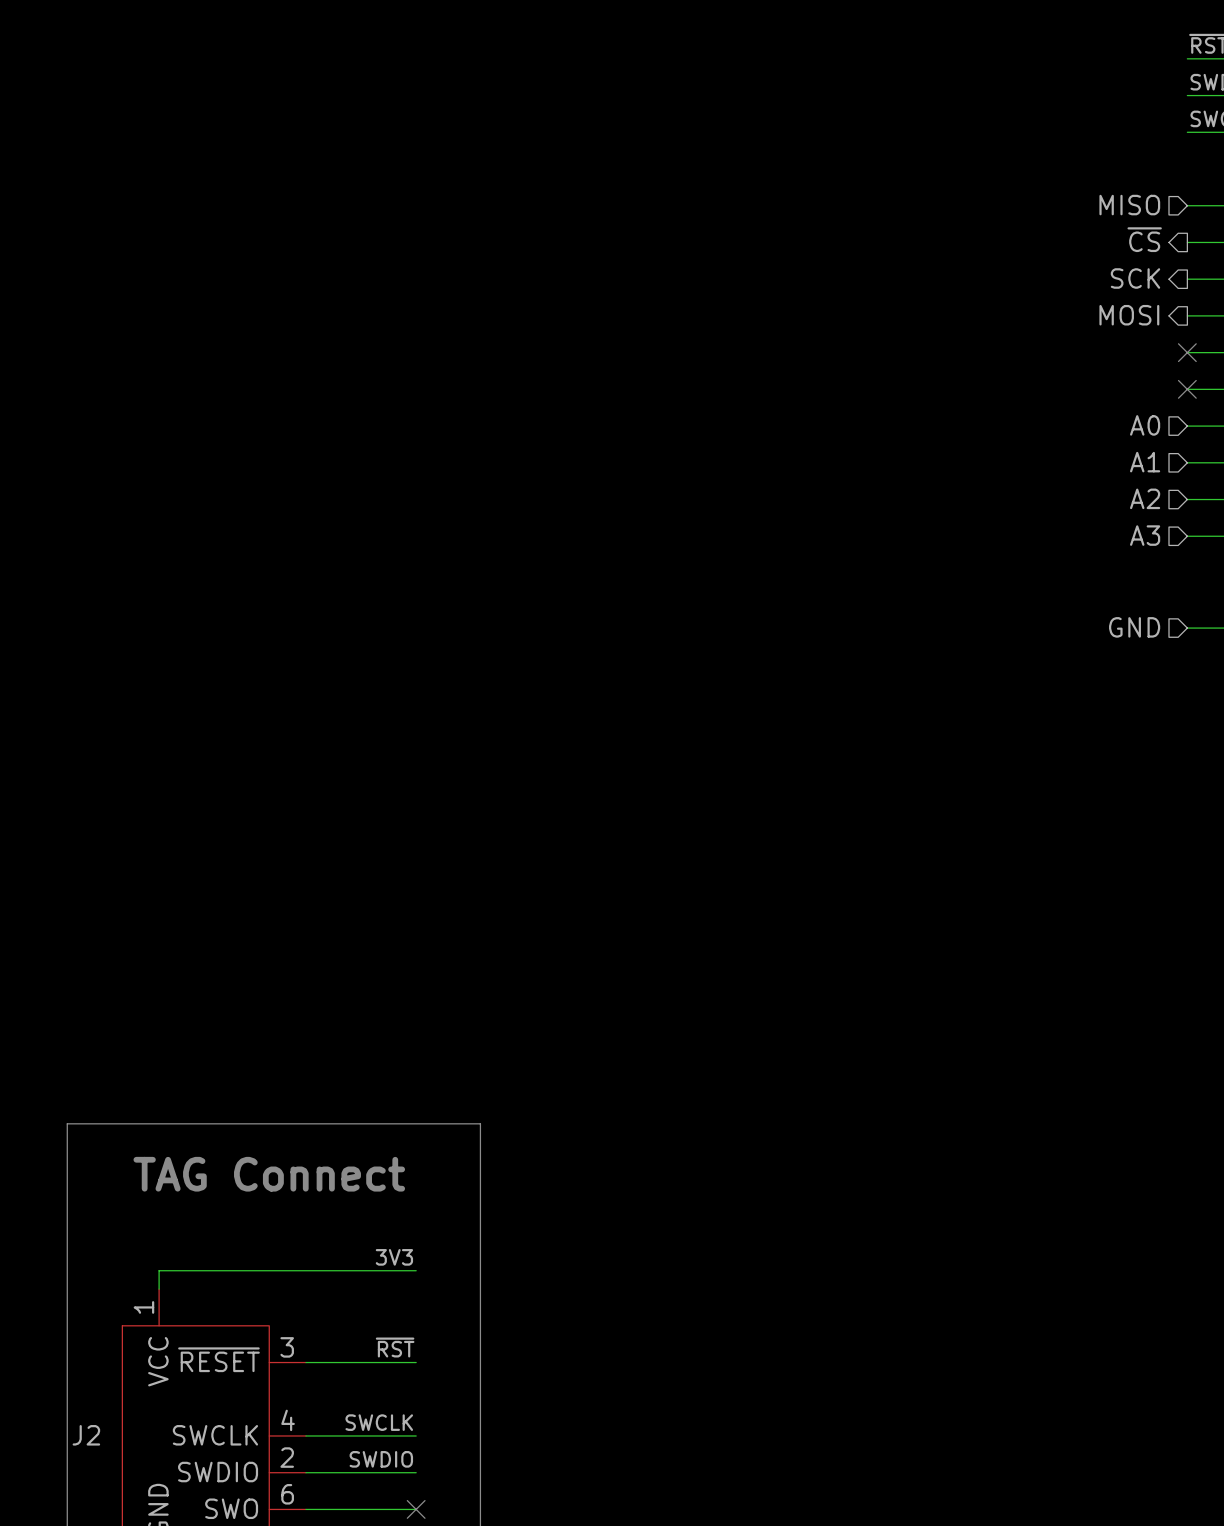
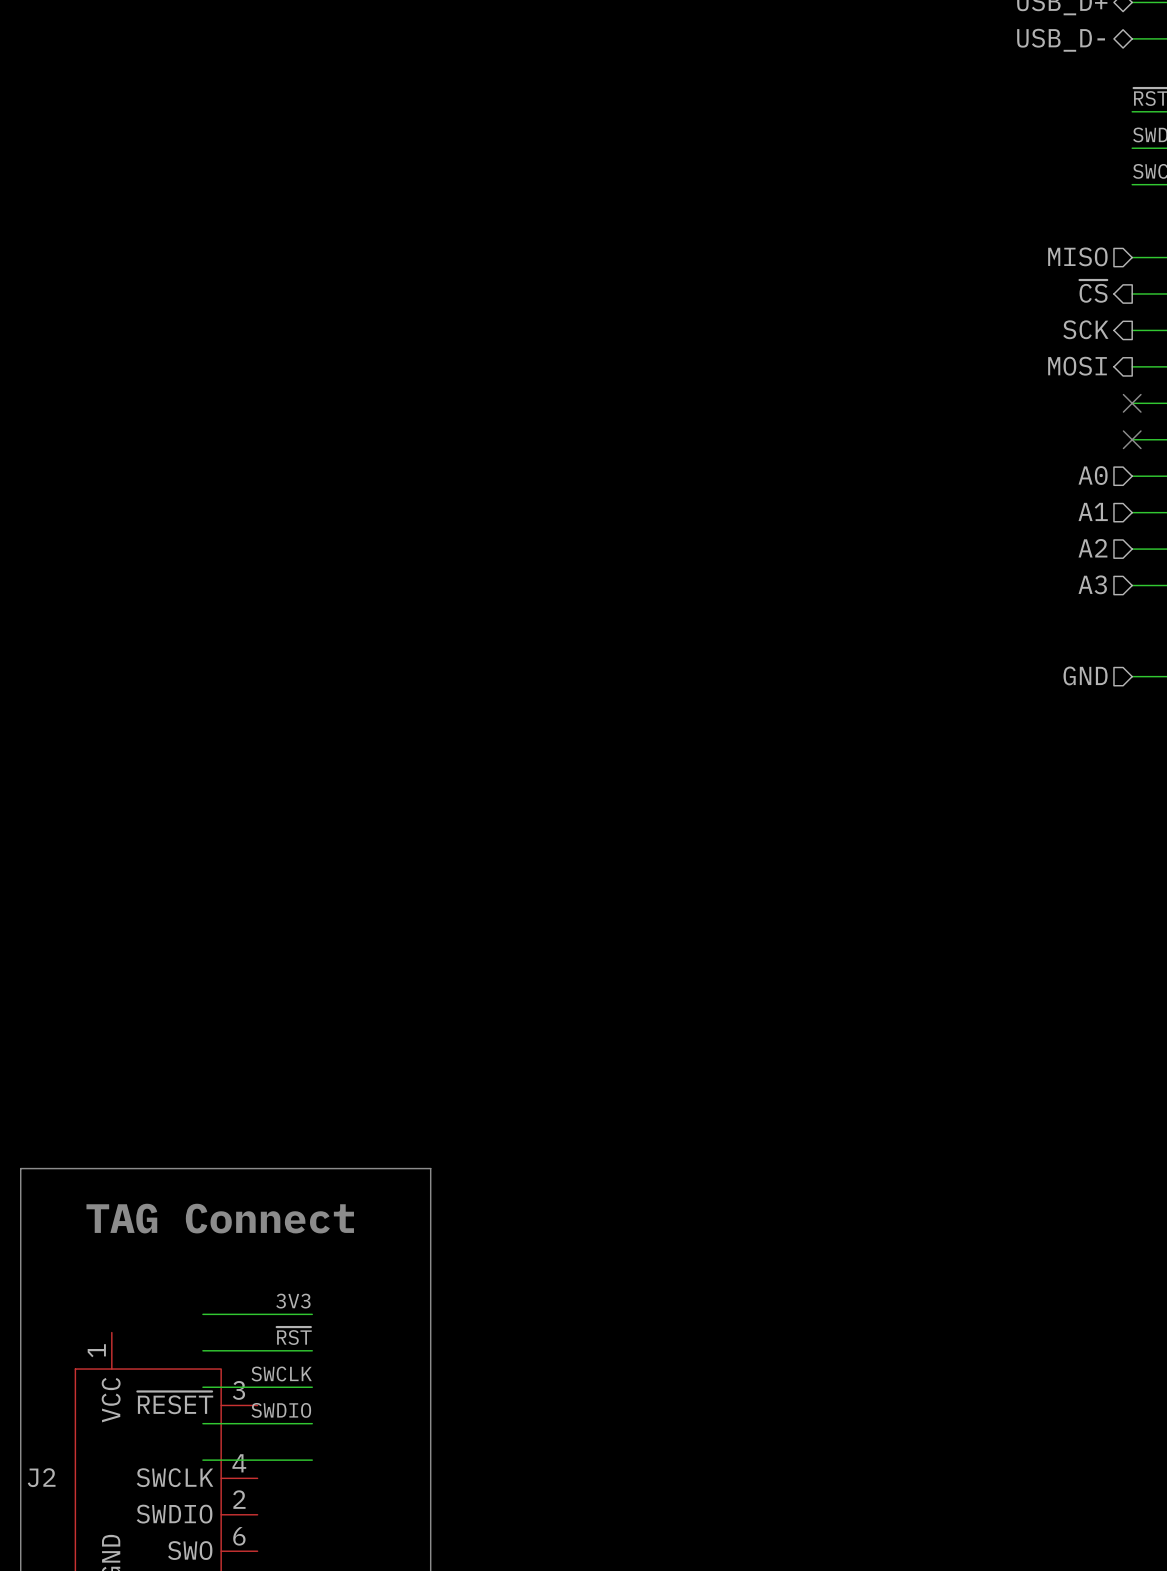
label position: 3V3 (394, 1257) -> 3V3 (293, 1301)
wire: (250, 1270) (159, 1270) (159, 1289) -> none
wire: (361, 1270) (416, 1270) -> none
label position: ~{RST} (395, 1347) -> ~{RST} (294, 1336)
wire: (305, 1362) (416, 1362) -> (202, 1350) (312, 1350)
label position: SWCLK (379, 1422) -> SWCLK (281, 1373)
wire: (305, 1435) (416, 1435) -> (202, 1423) (312, 1423)
label position: SWDIO (381, 1459) -> SWDIO (281, 1410)
wire: (305, 1472) (416, 1472) -> (202, 1460) (312, 1460)
wire: (305, 1509) (416, 1509) -> (202, 1387) (312, 1387)
no-connect mark: (416, 1509) -> none

